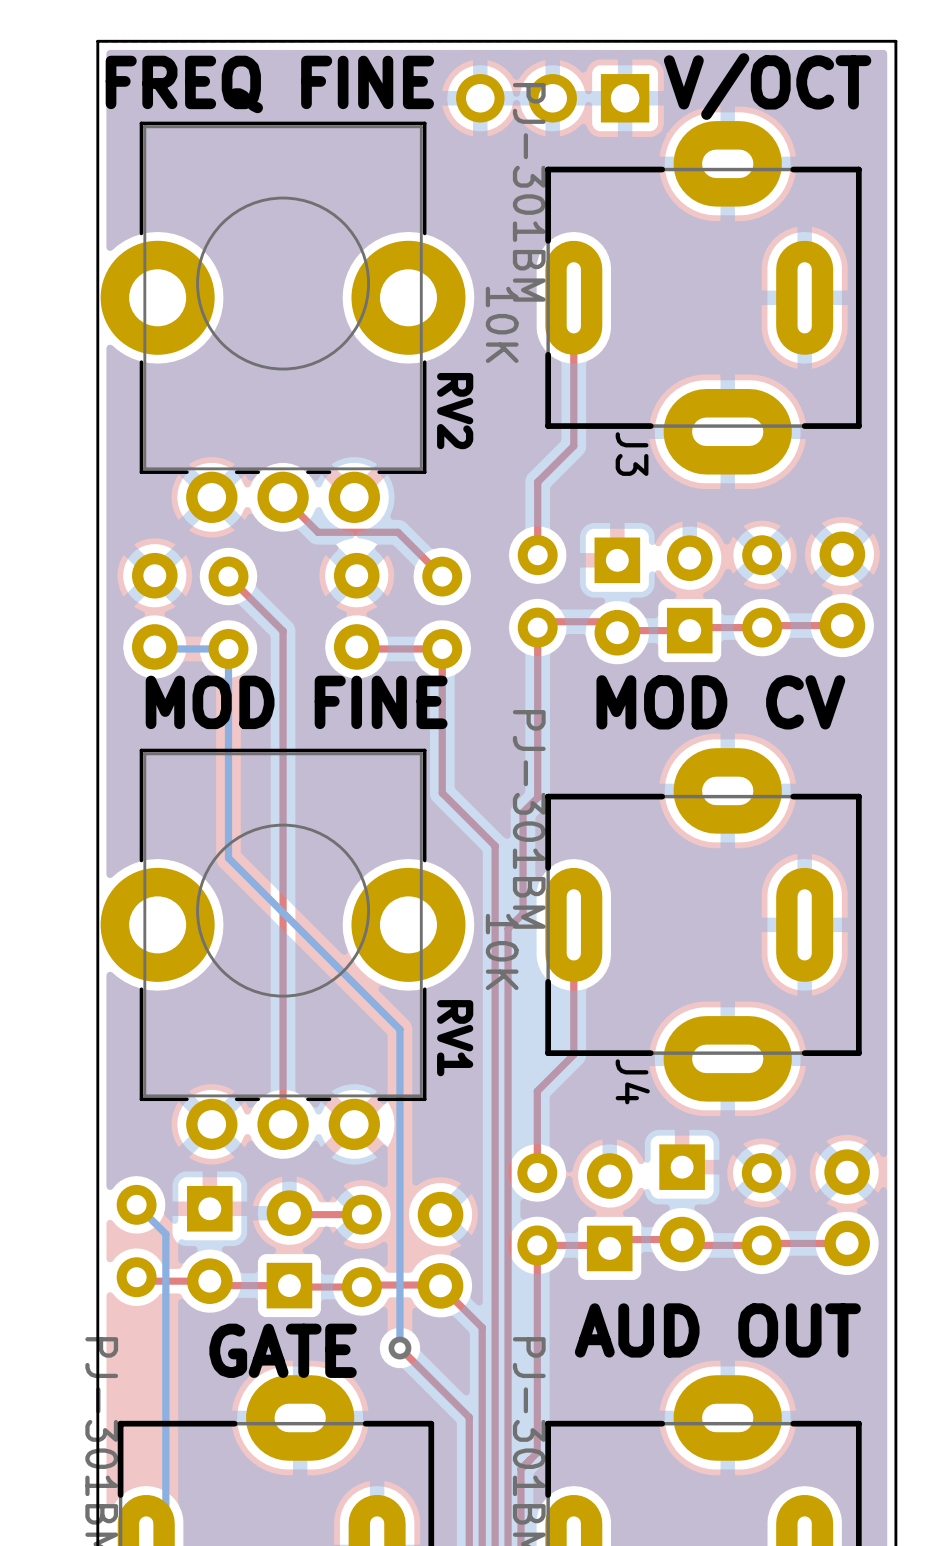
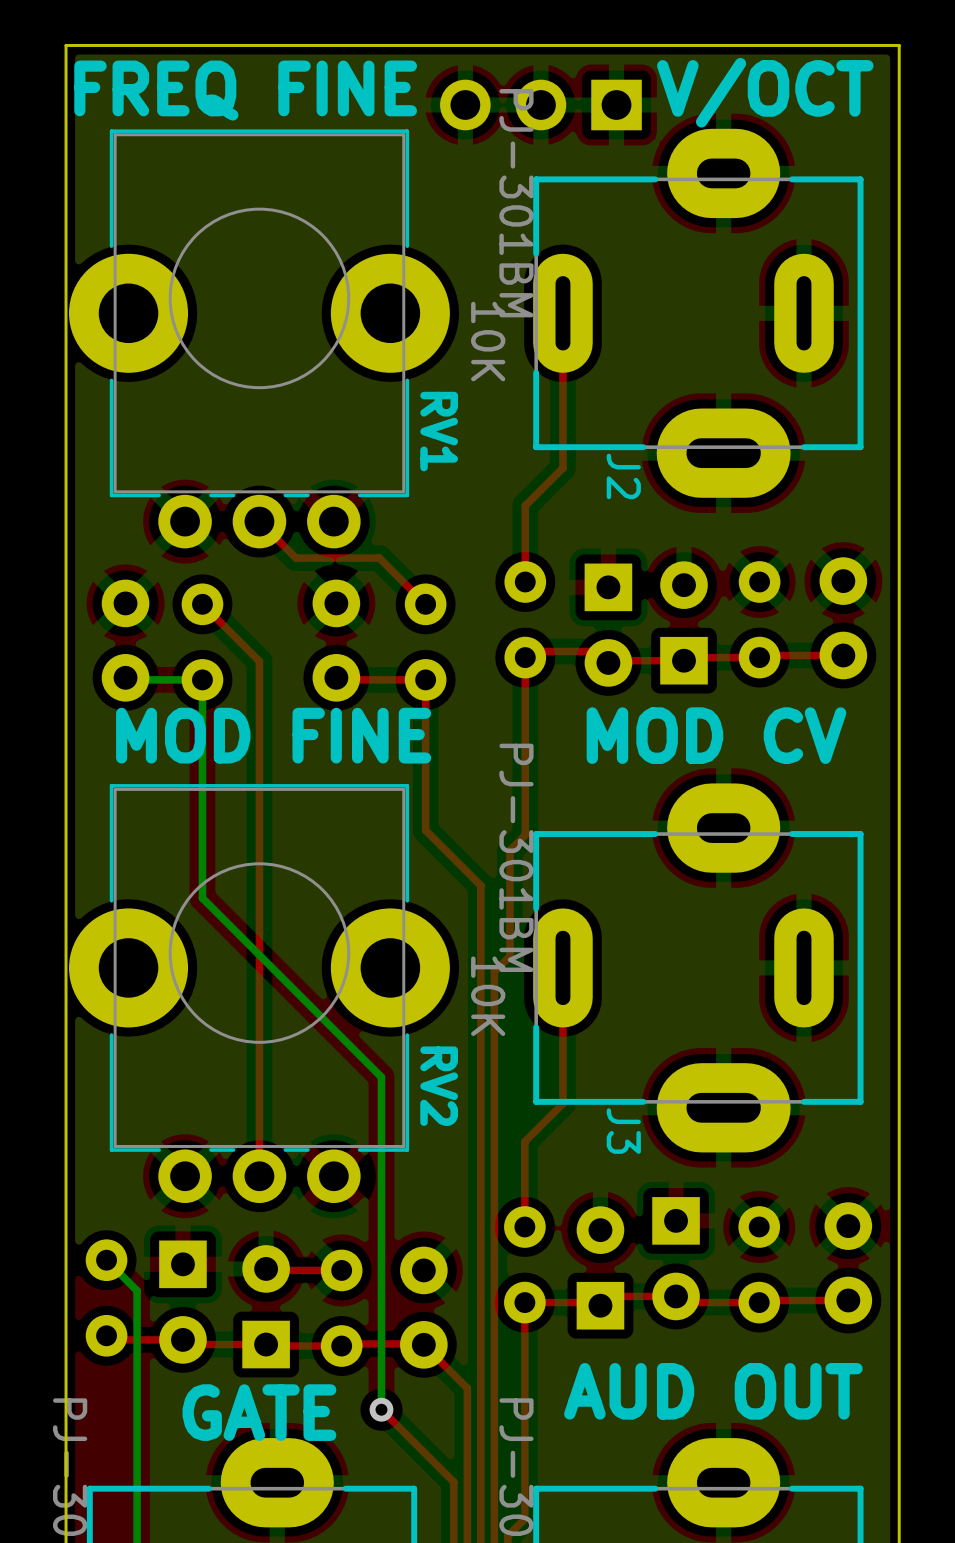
RV2 name: RV2 (455, 411) -> RV1 (439, 431)
J3 name: J3 (632, 454) -> J2 (623, 476)
RV1 name: RV1 (455, 1038) -> RV2 (439, 1086)
J4 name: J4 (632, 1081) -> J3 (623, 1131)

